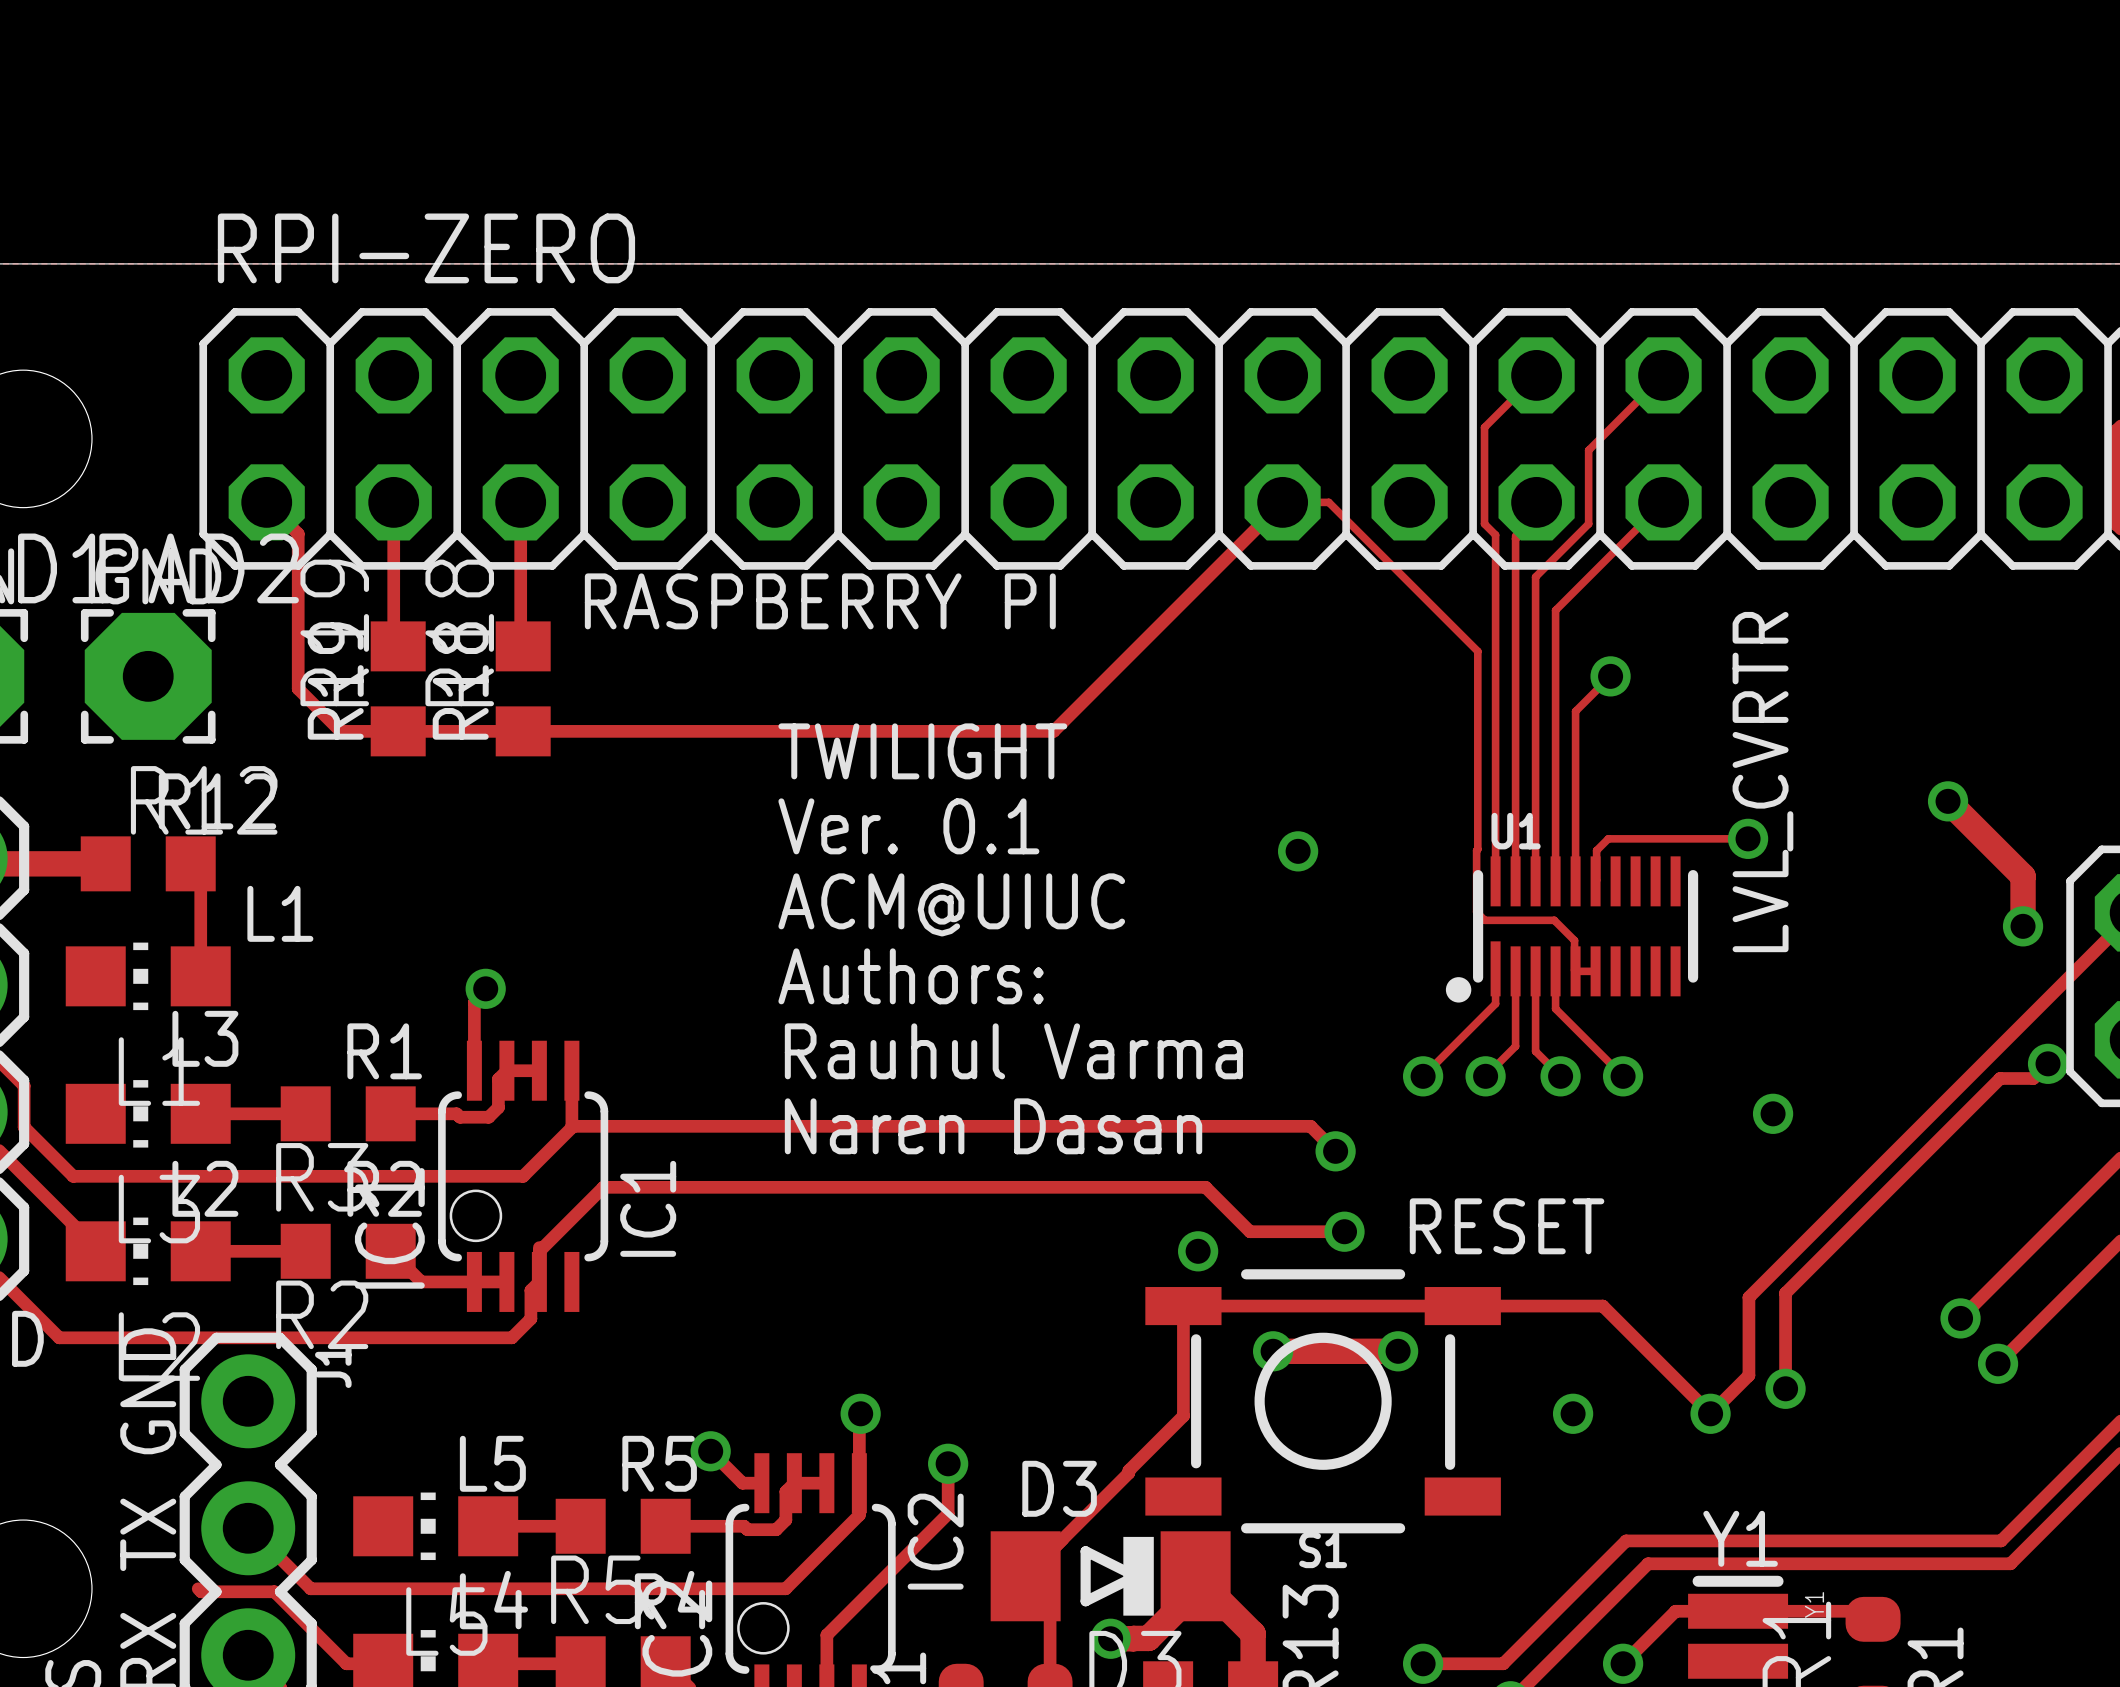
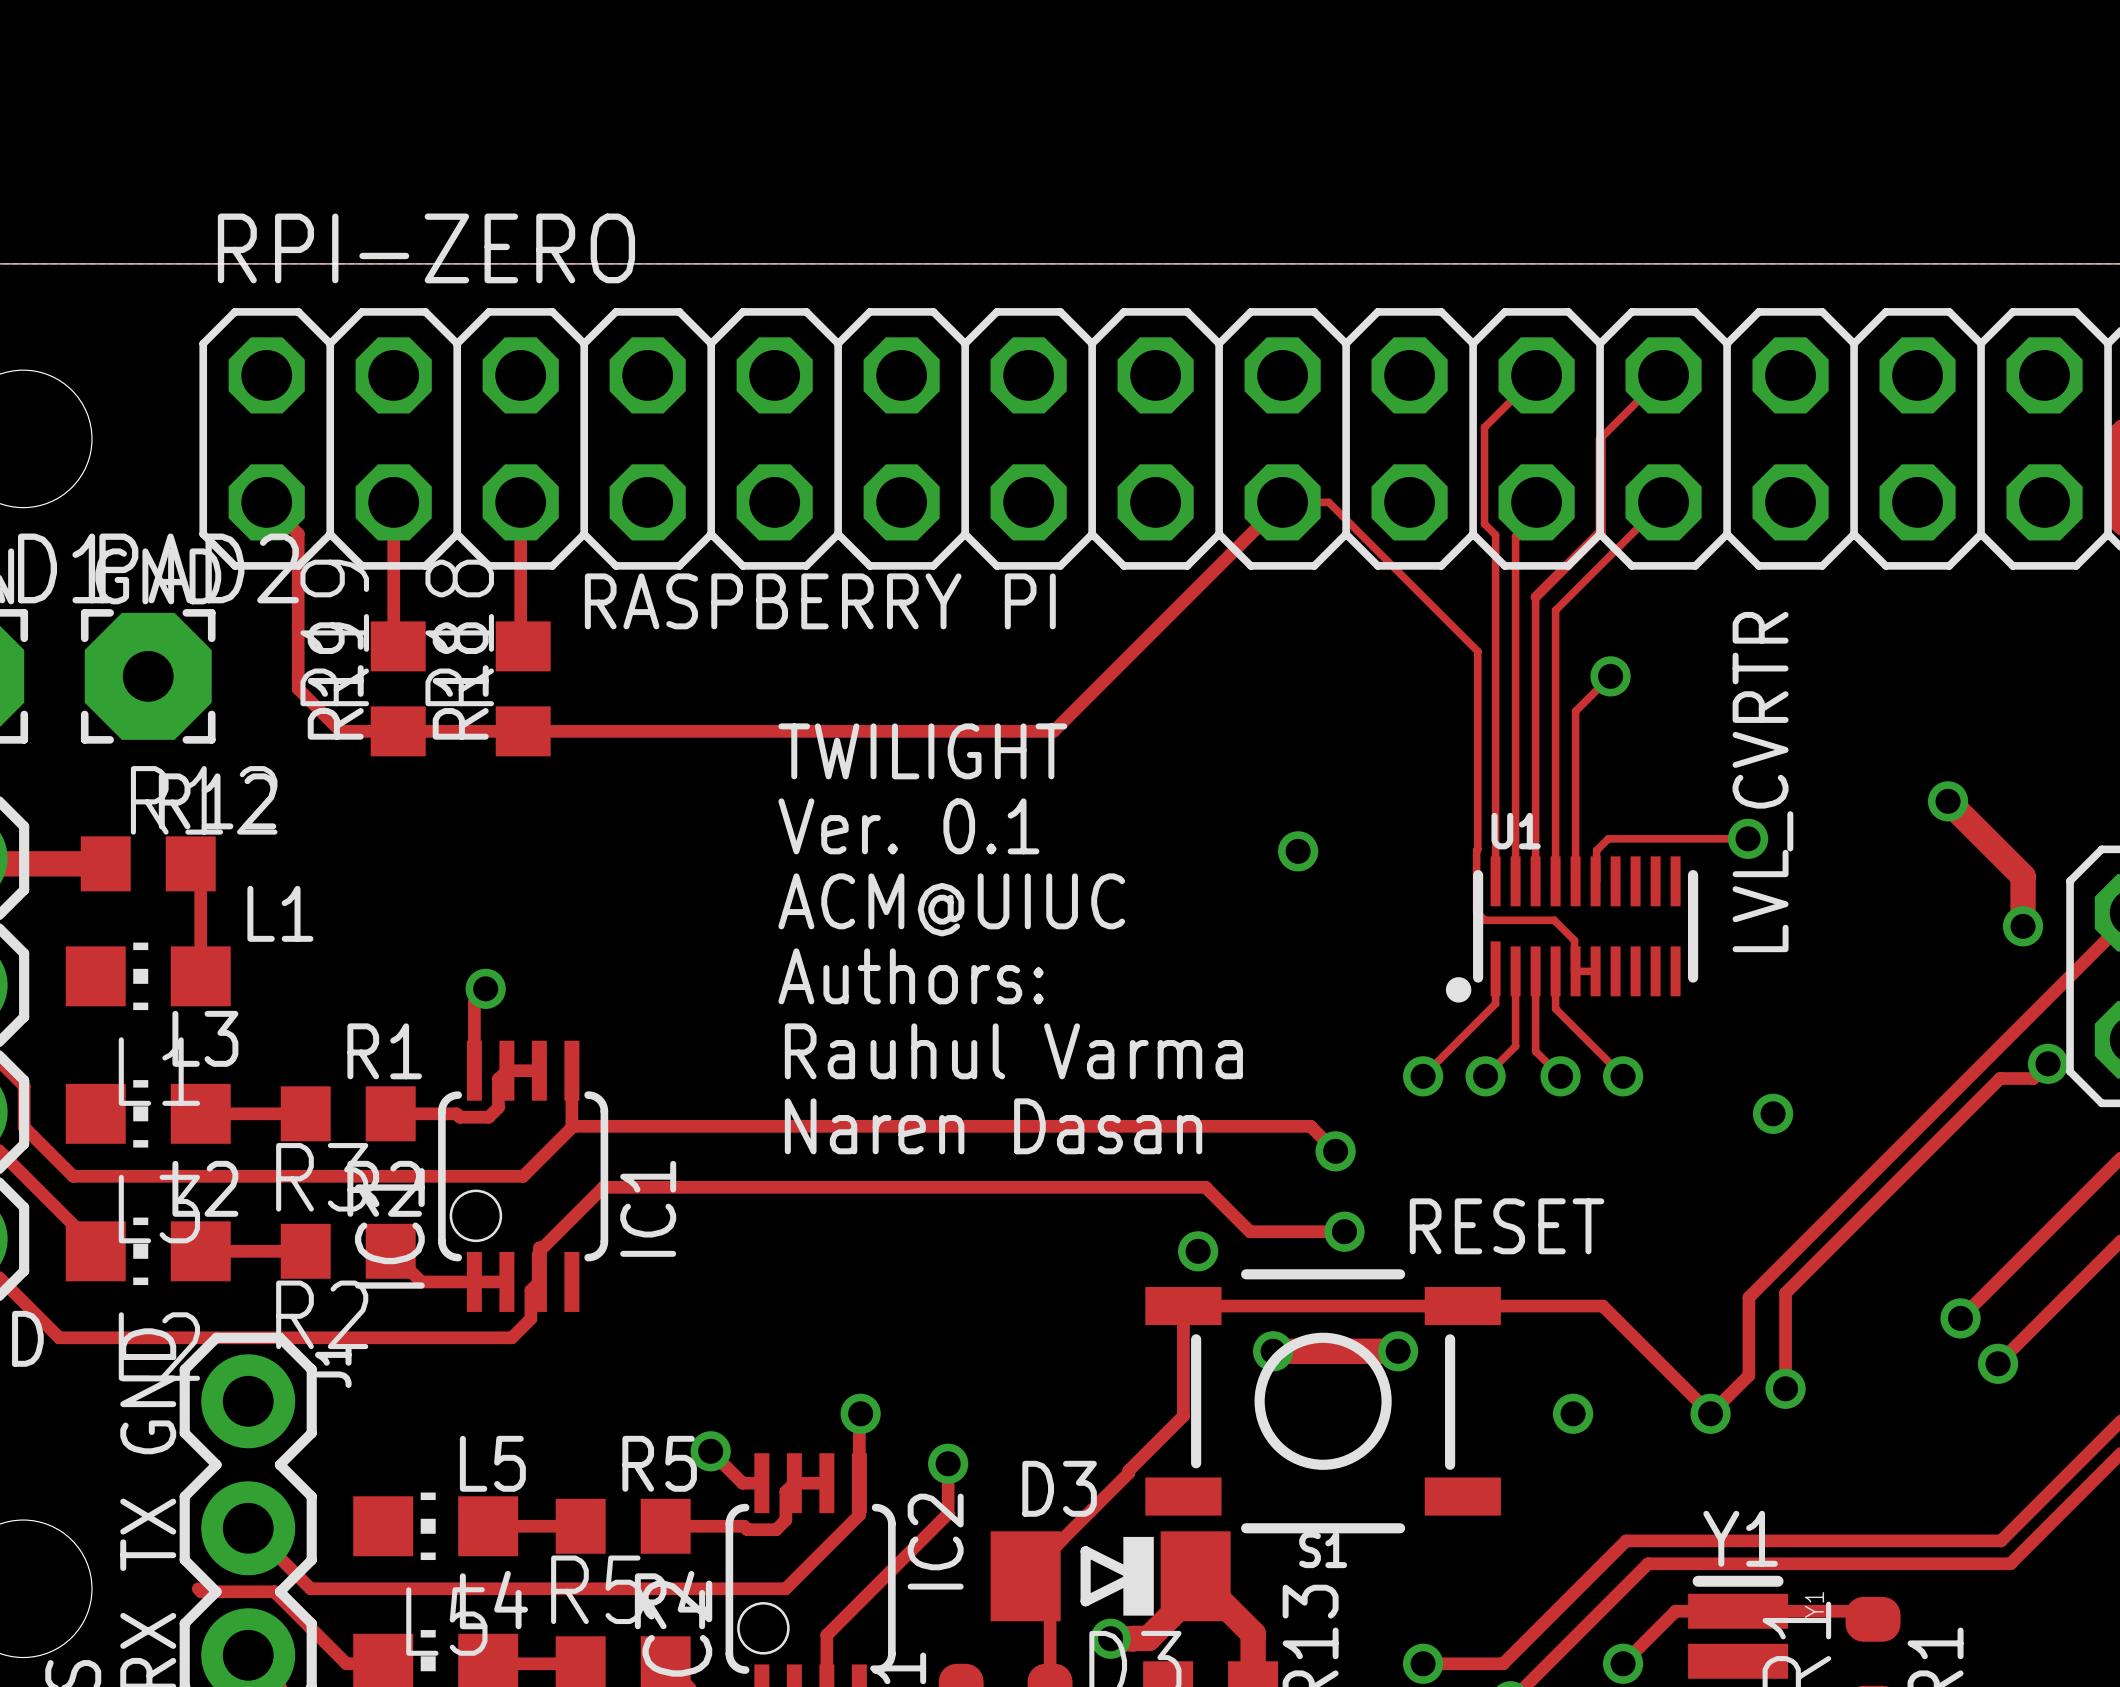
track: (1600, 438) (1588, 450) (1588, 523) (1535, 577) (1535, 597) -> (1600, 438) (1600, 531) (1535, 597)

